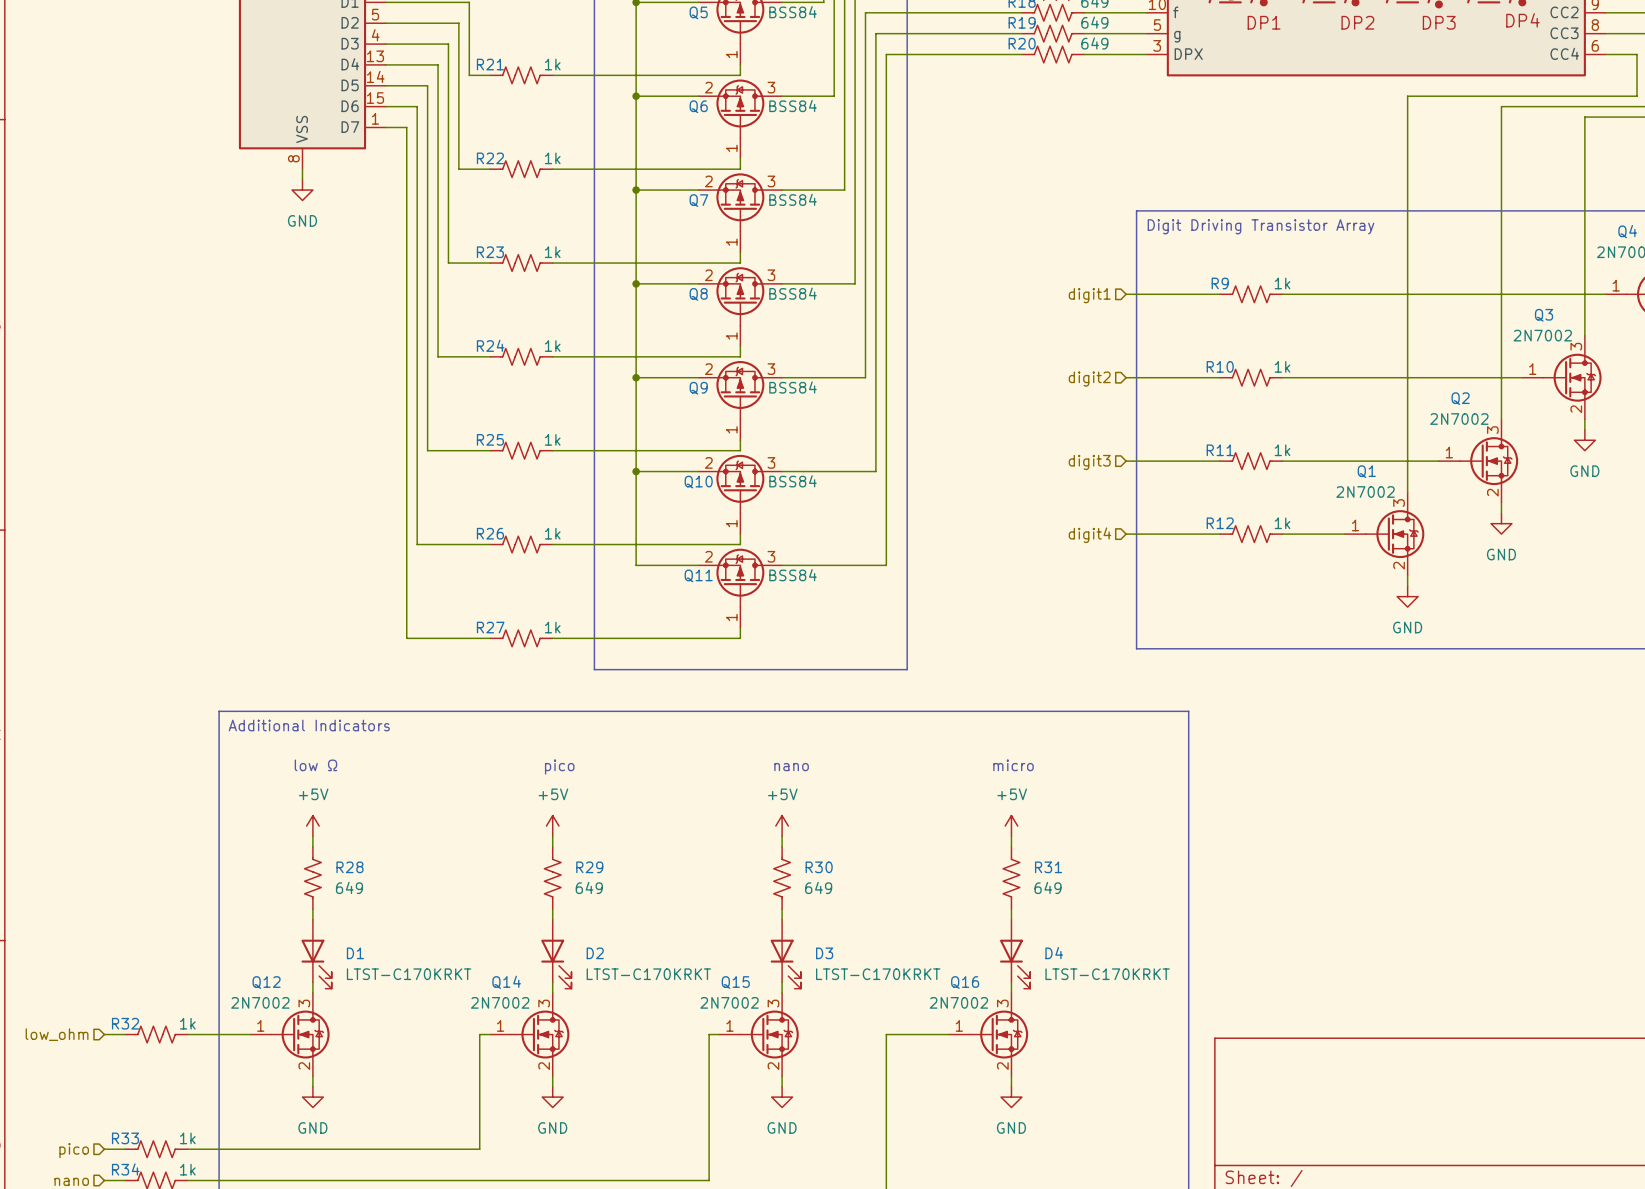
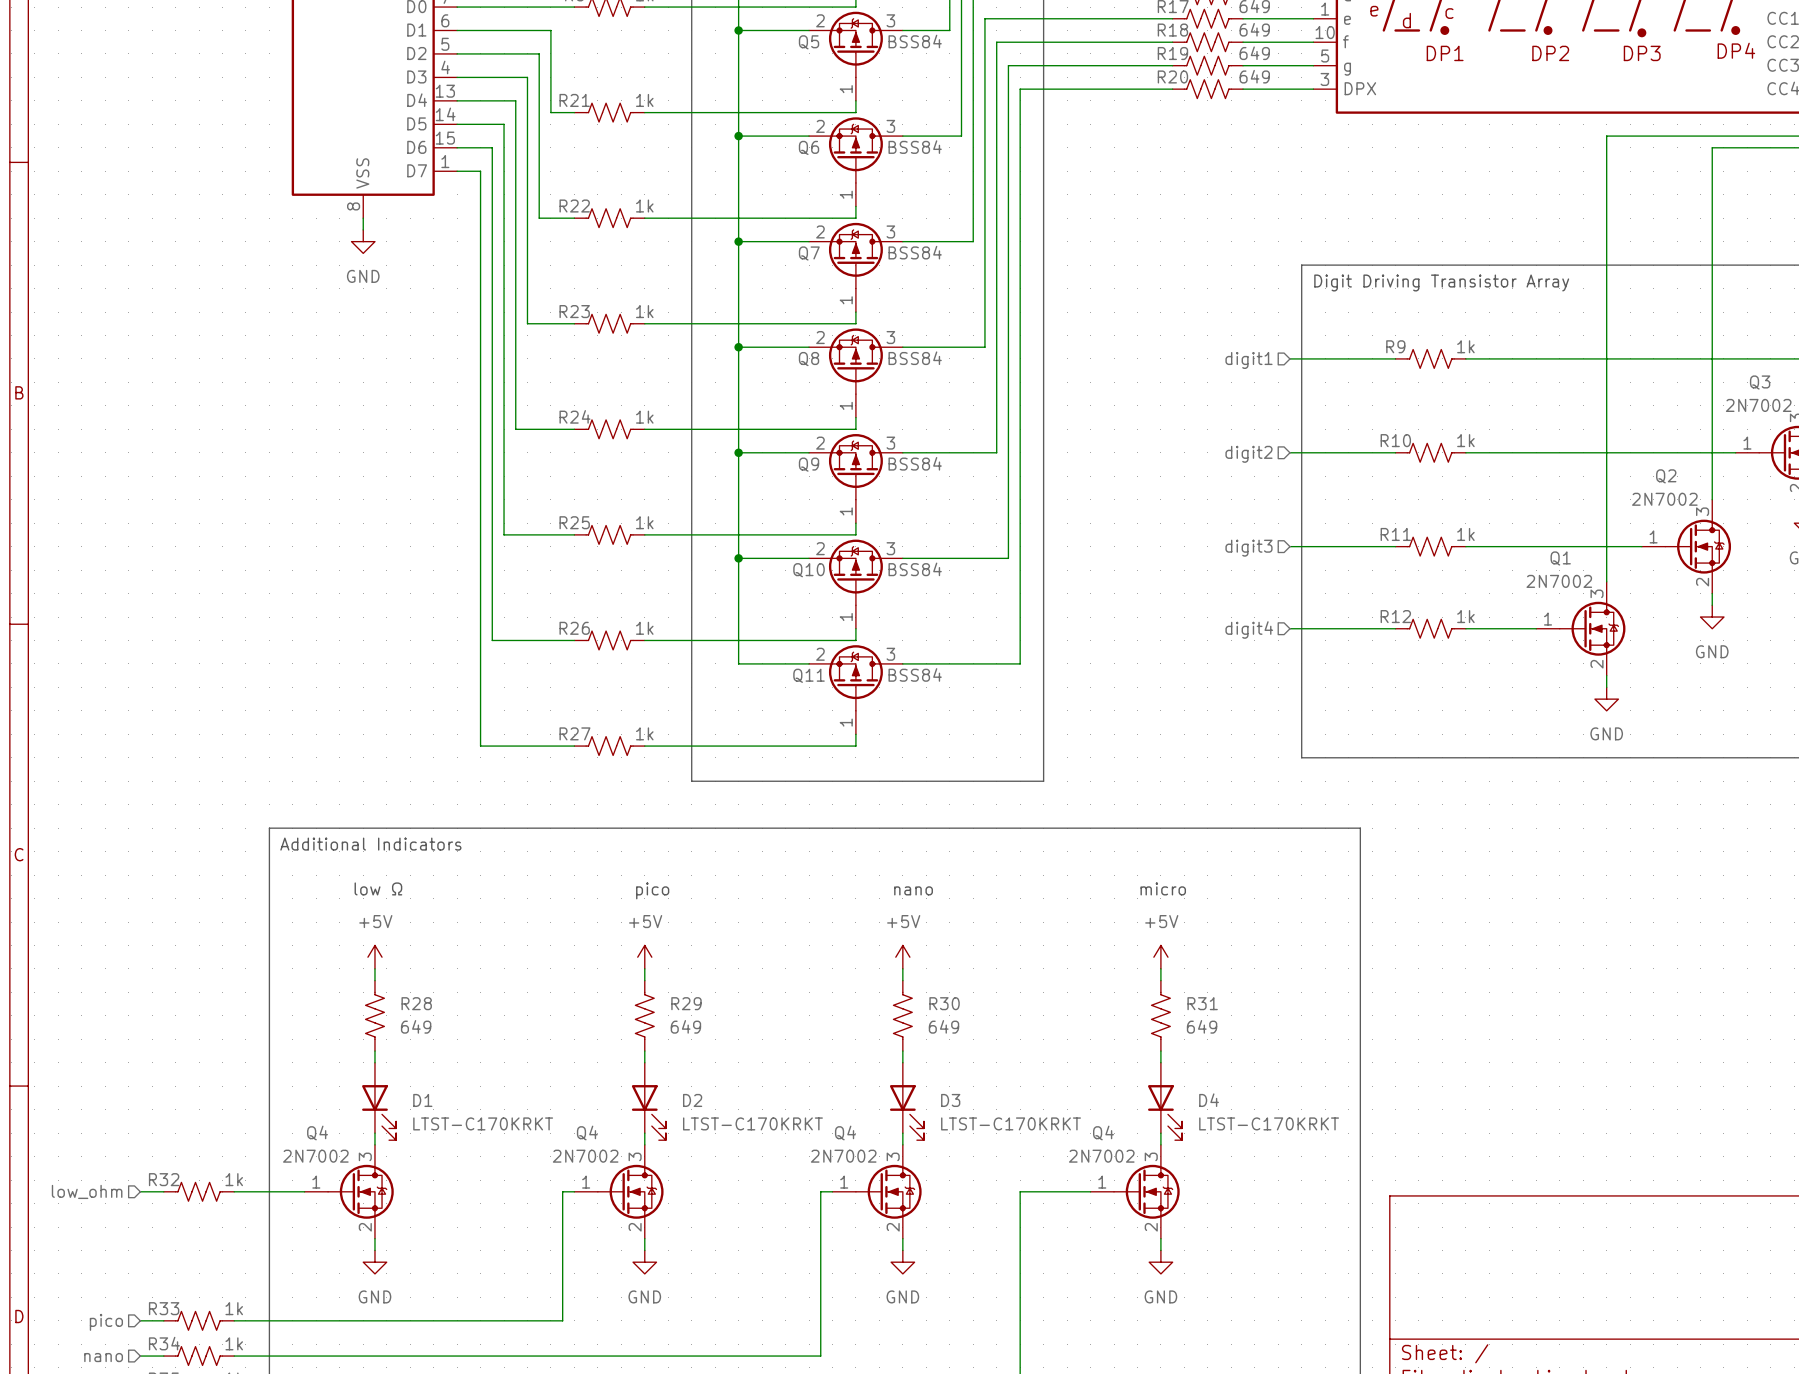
Q12 name: Q12 (266, 982) -> Q4 (317, 1132)
Q14 name: Q14 (506, 982) -> Q4 (587, 1132)
Q15 name: Q15 (735, 982) -> Q4 (845, 1132)
Q16 name: Q16 (965, 982) -> Q4 (1103, 1132)

